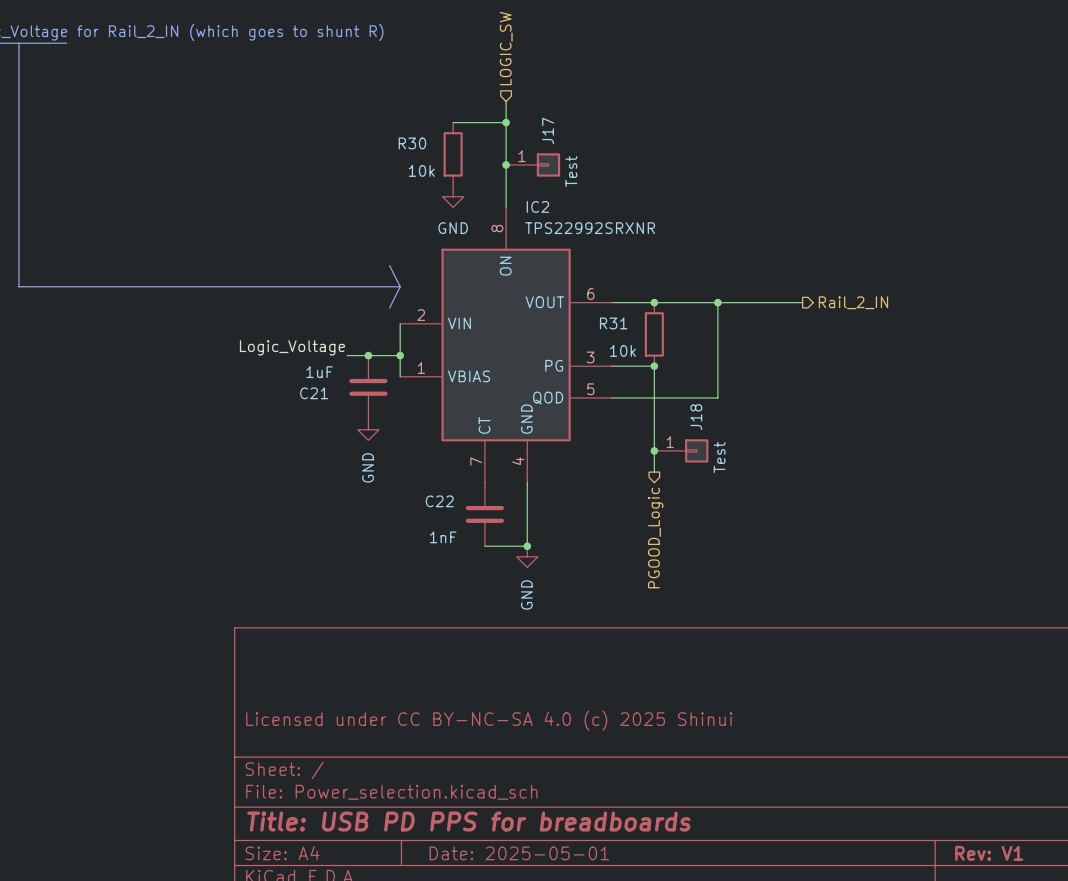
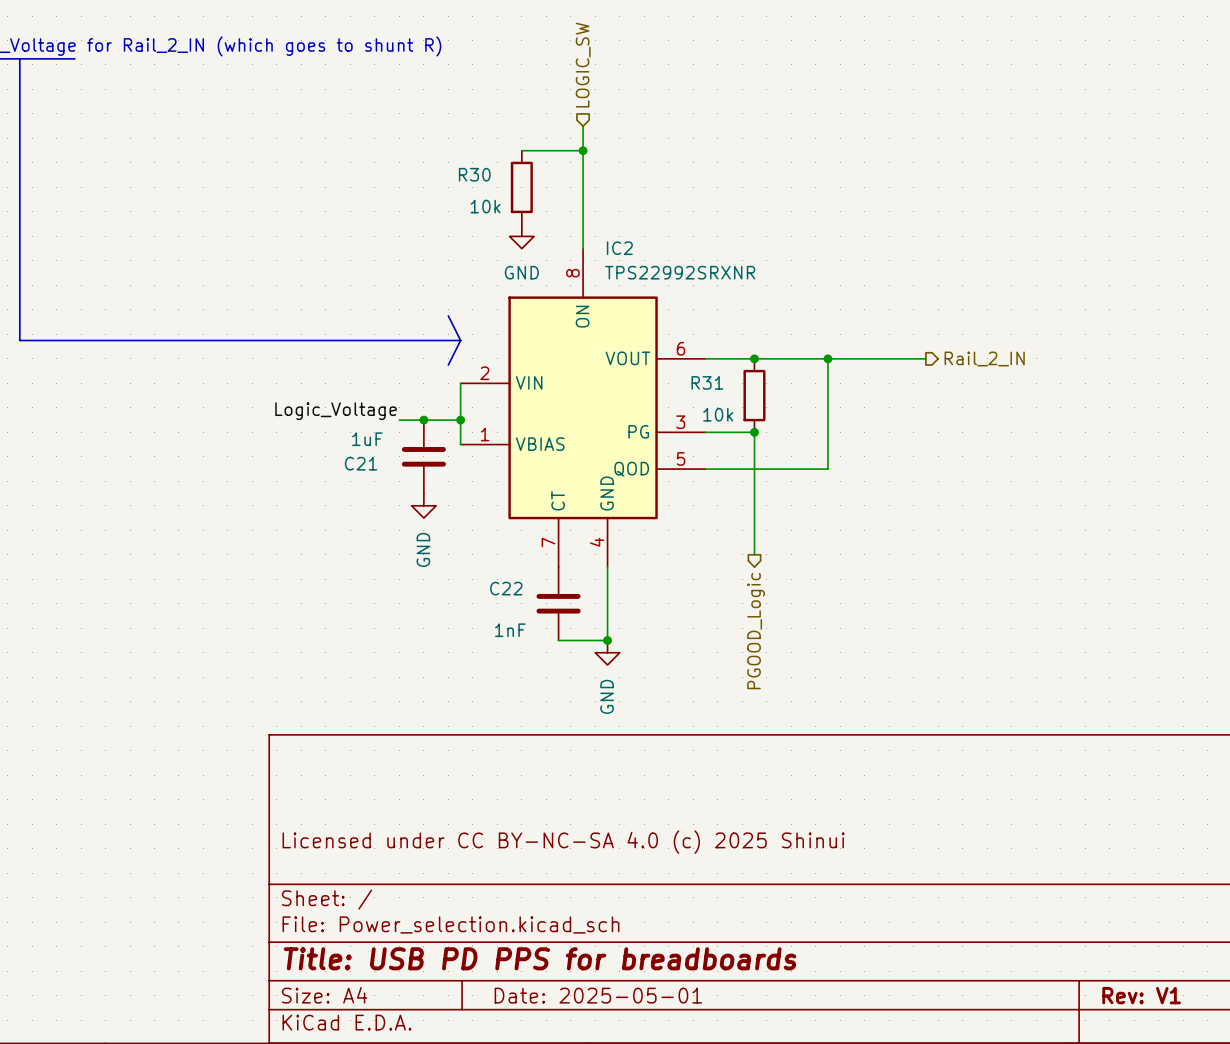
junction: (506, 164) -> none
J17: Test (533, 164) -> none
junction: (654, 450) -> none
J18: Test (681, 450) -> none

